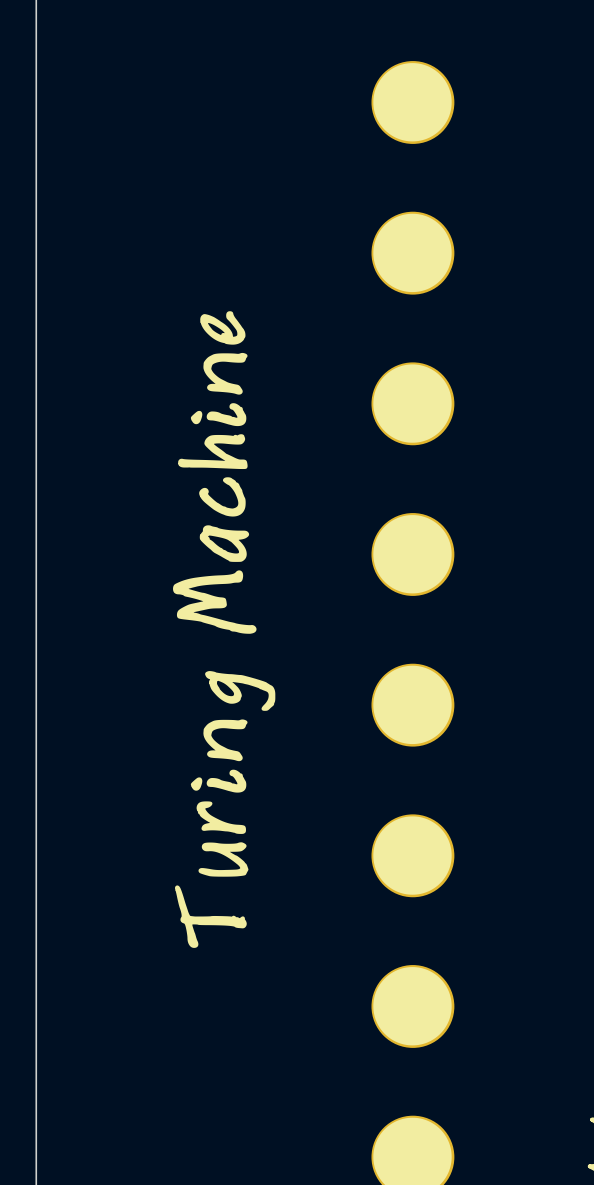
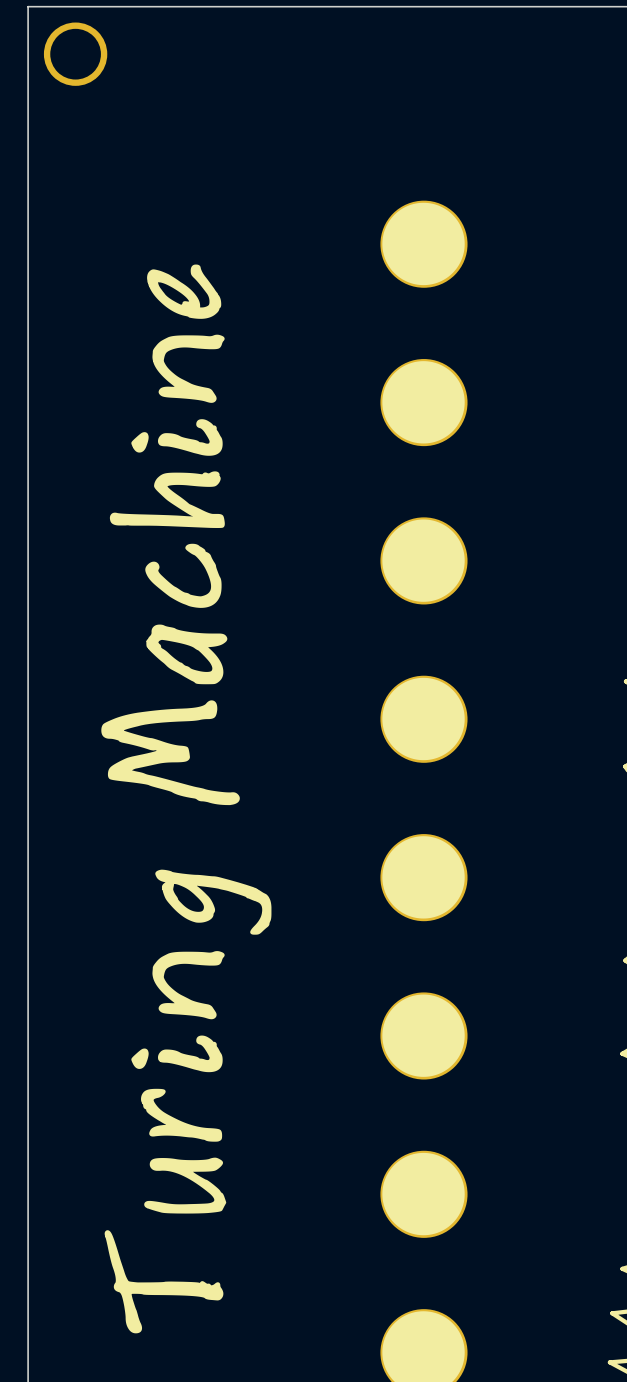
drawing: none -> [109, 264, 225, 529]
drawing: [173, 311, 257, 634] -> none
drawing shape: [190, 410, 203, 425] -> [145, 543, 222, 608]
drawing: none -> [101, 624, 240, 806]
drawing: [175, 671, 276, 948] -> none
drawing: none -> [104, 869, 272, 1334]

